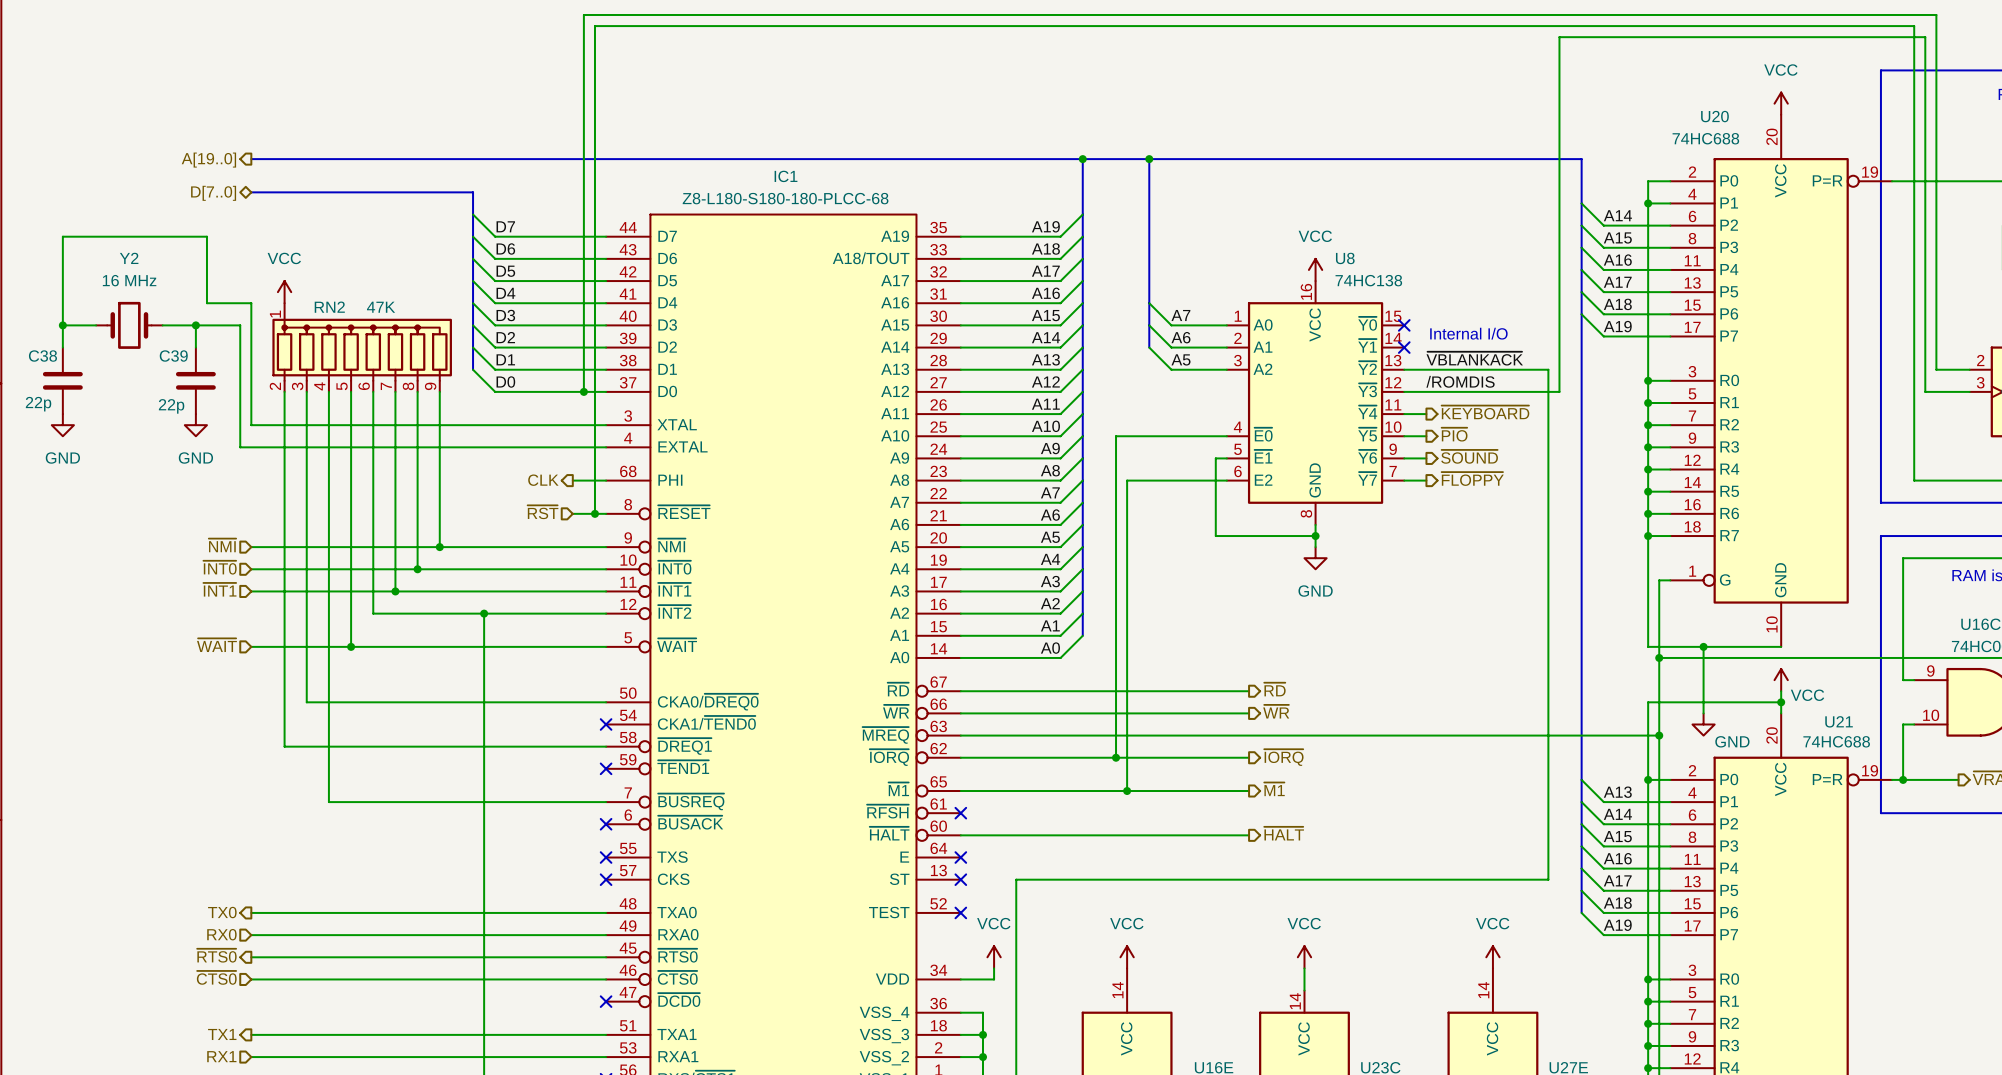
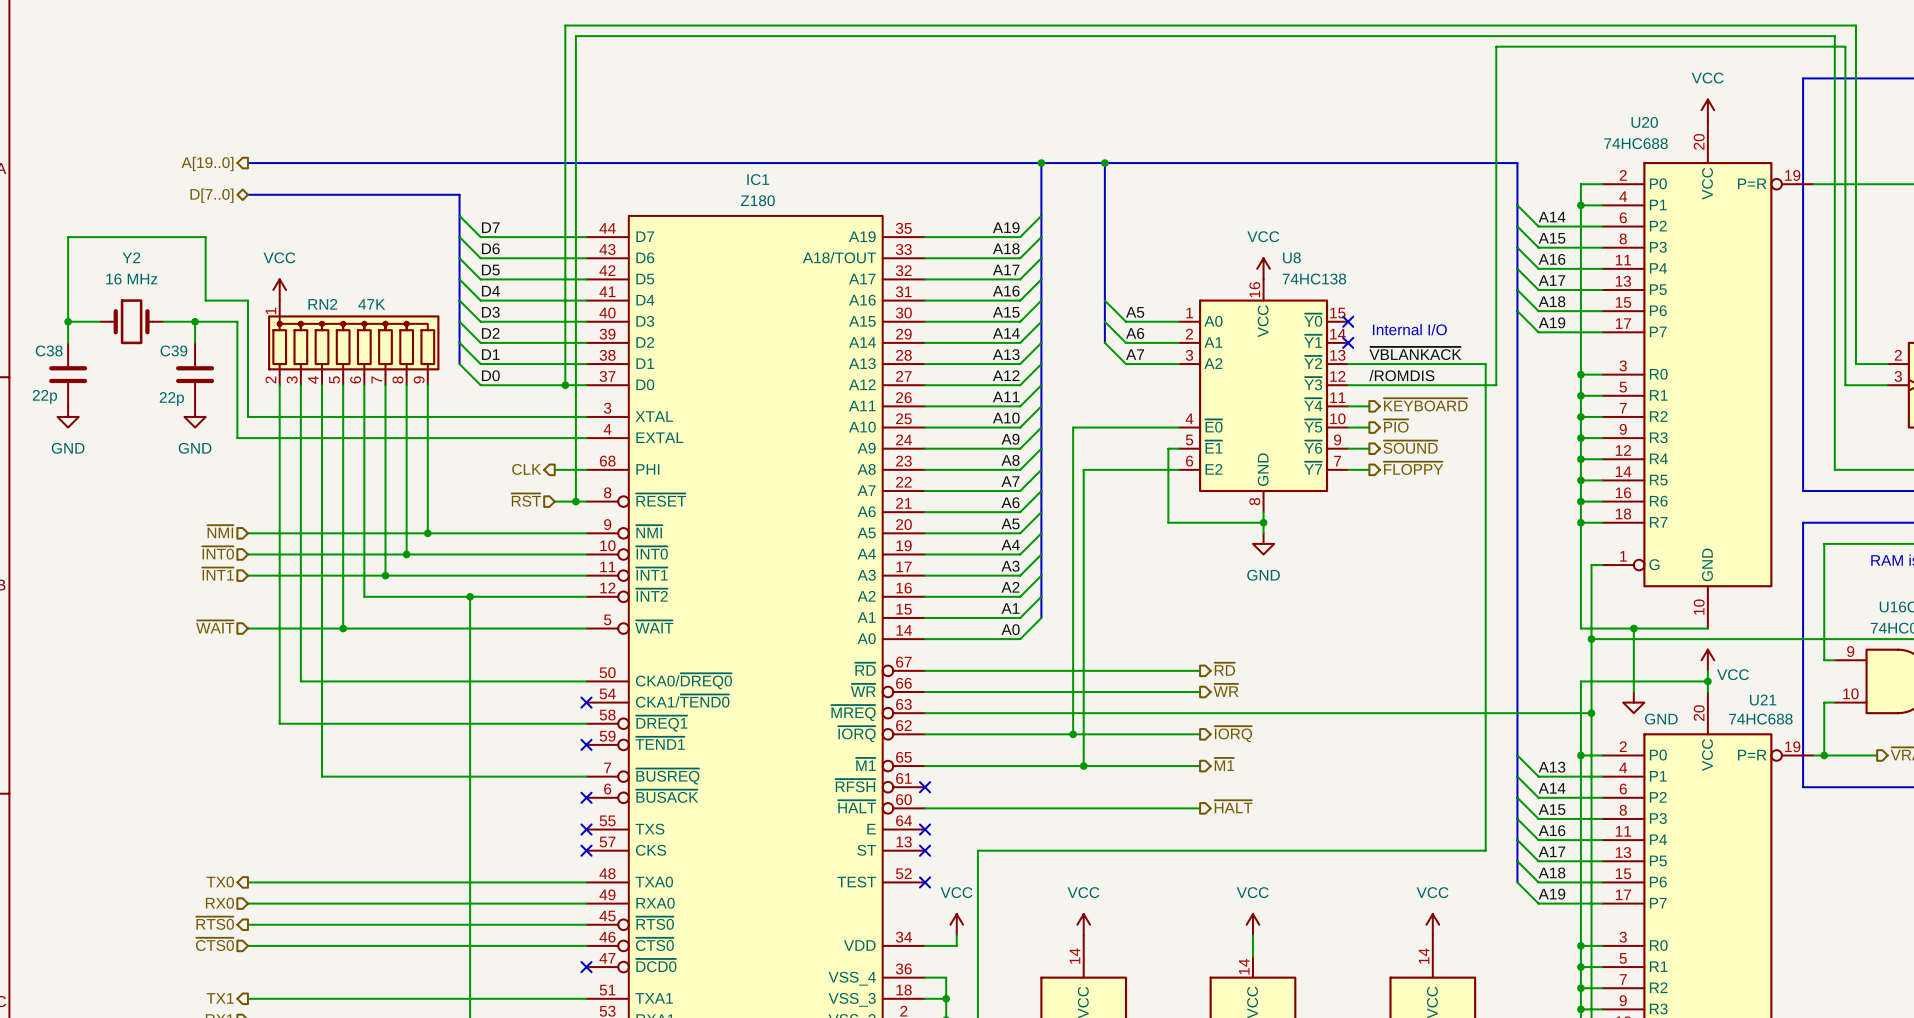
IC1 value: Z8-L180-S180-180-PLCC-68 (785, 198) -> Z180 (757, 200)
label: A7 (1180, 315) -> A5 (1135, 312)
label: A5 (1180, 359) -> A7 (1135, 354)

